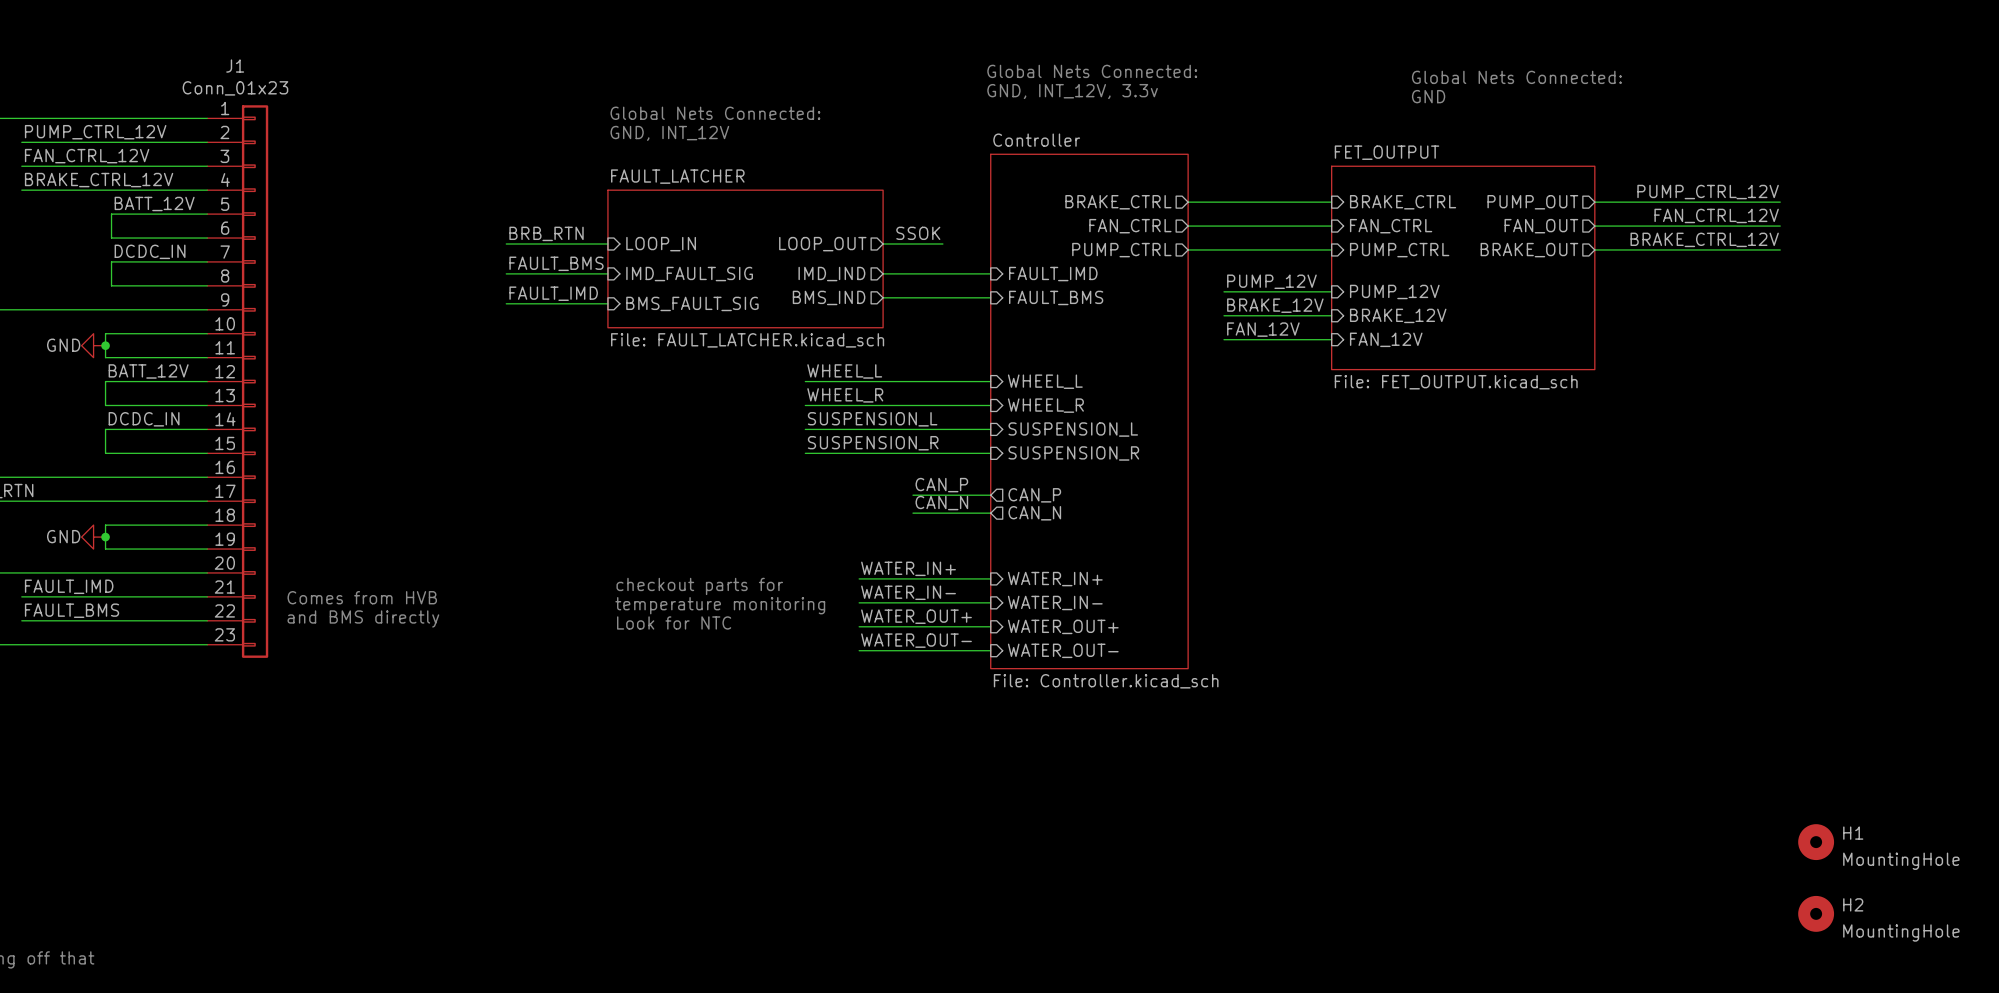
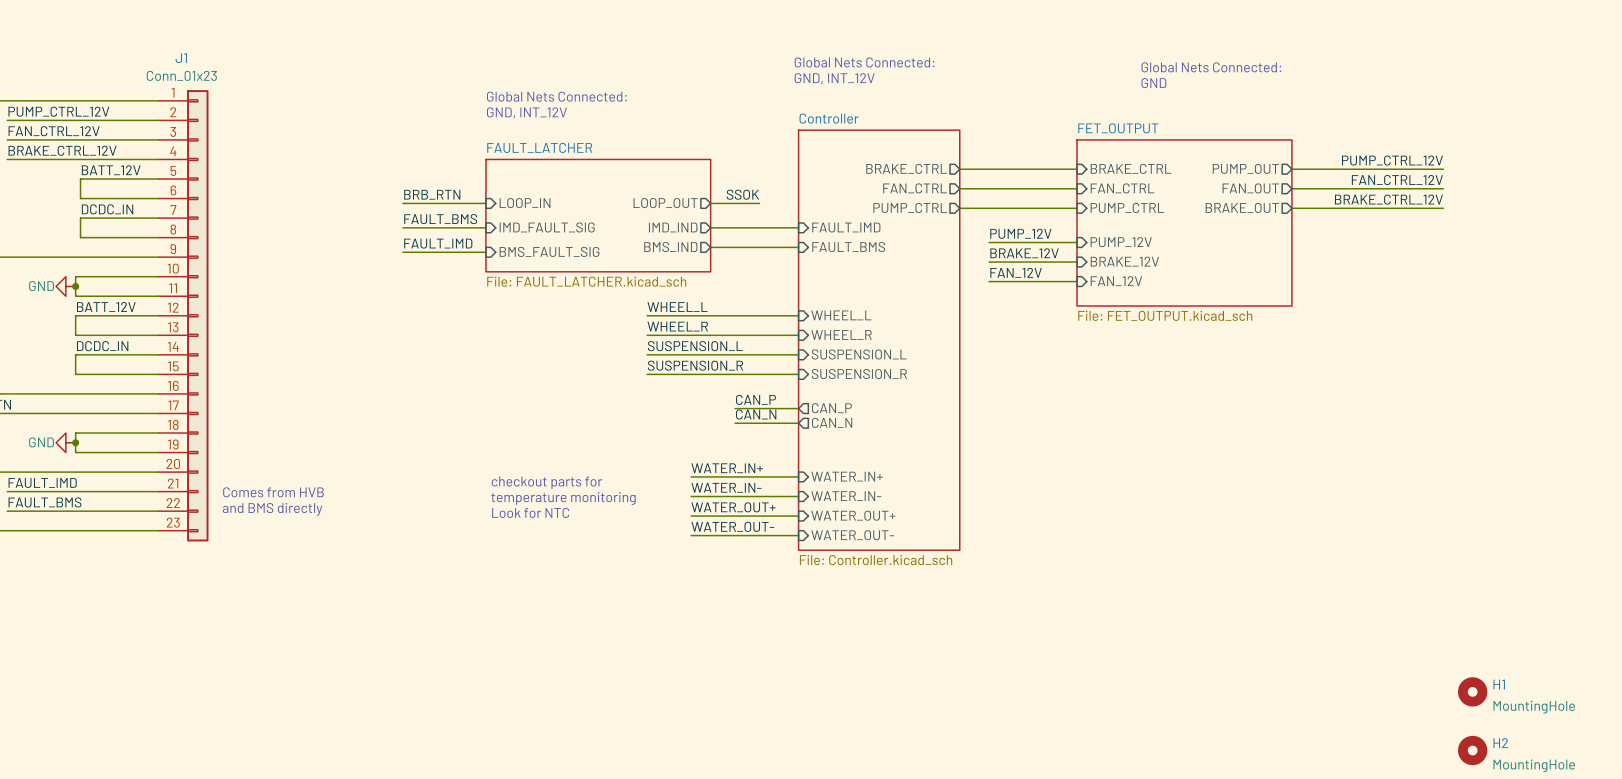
text: GND, INT_12V, 3.3v (1072, 91) -> GND, INT_12V (834, 78)

